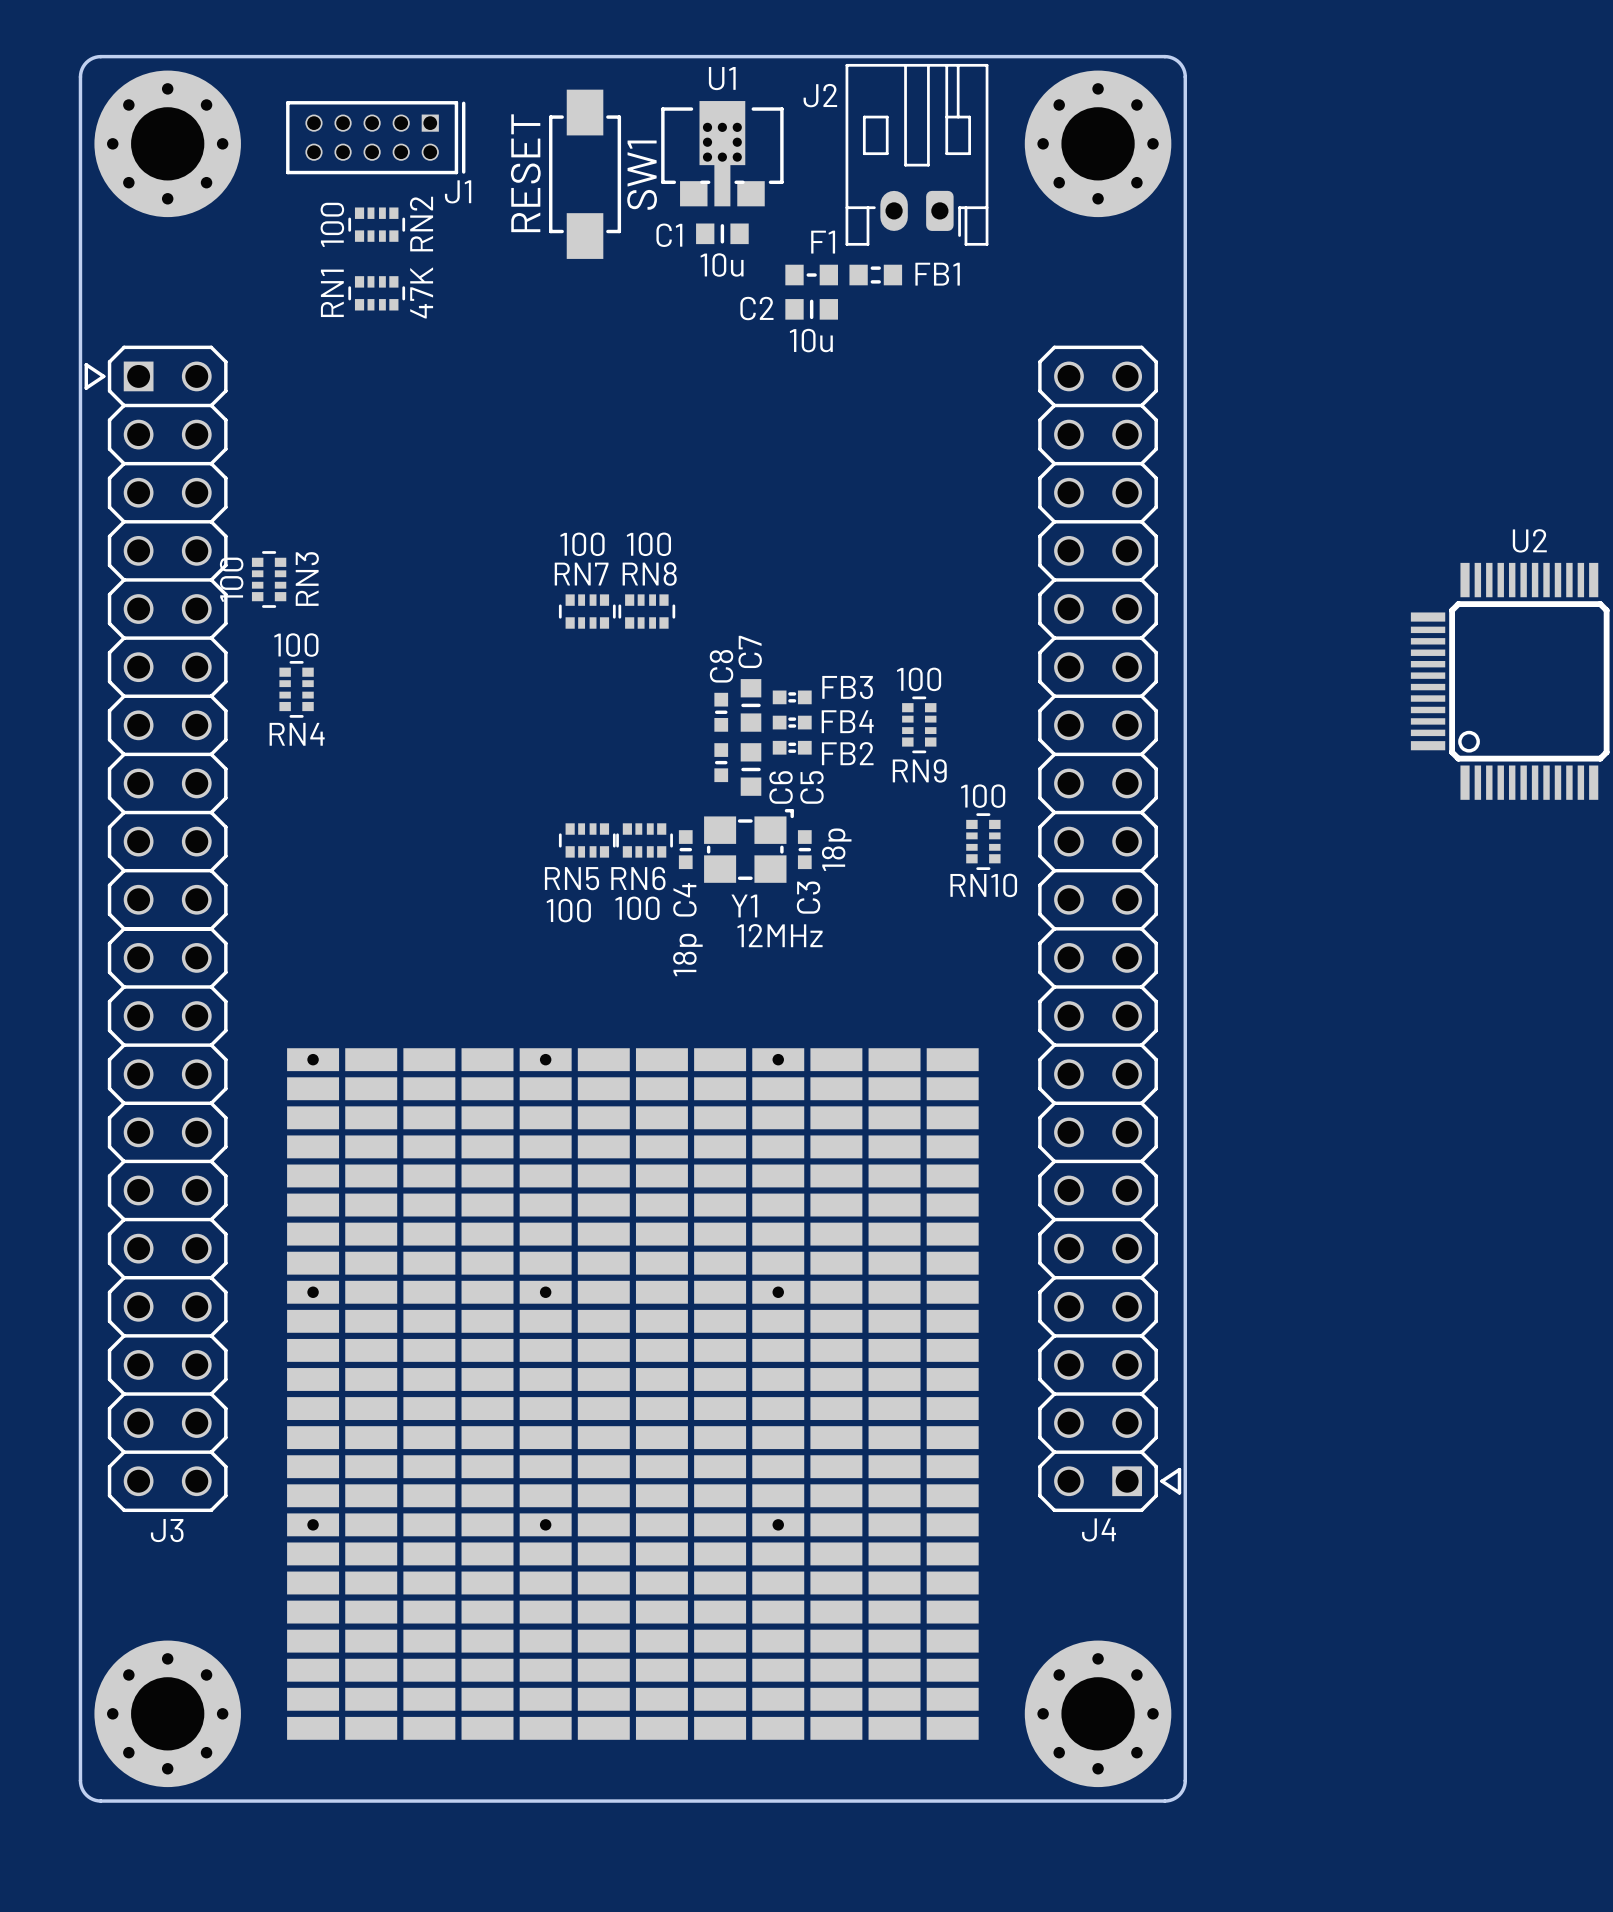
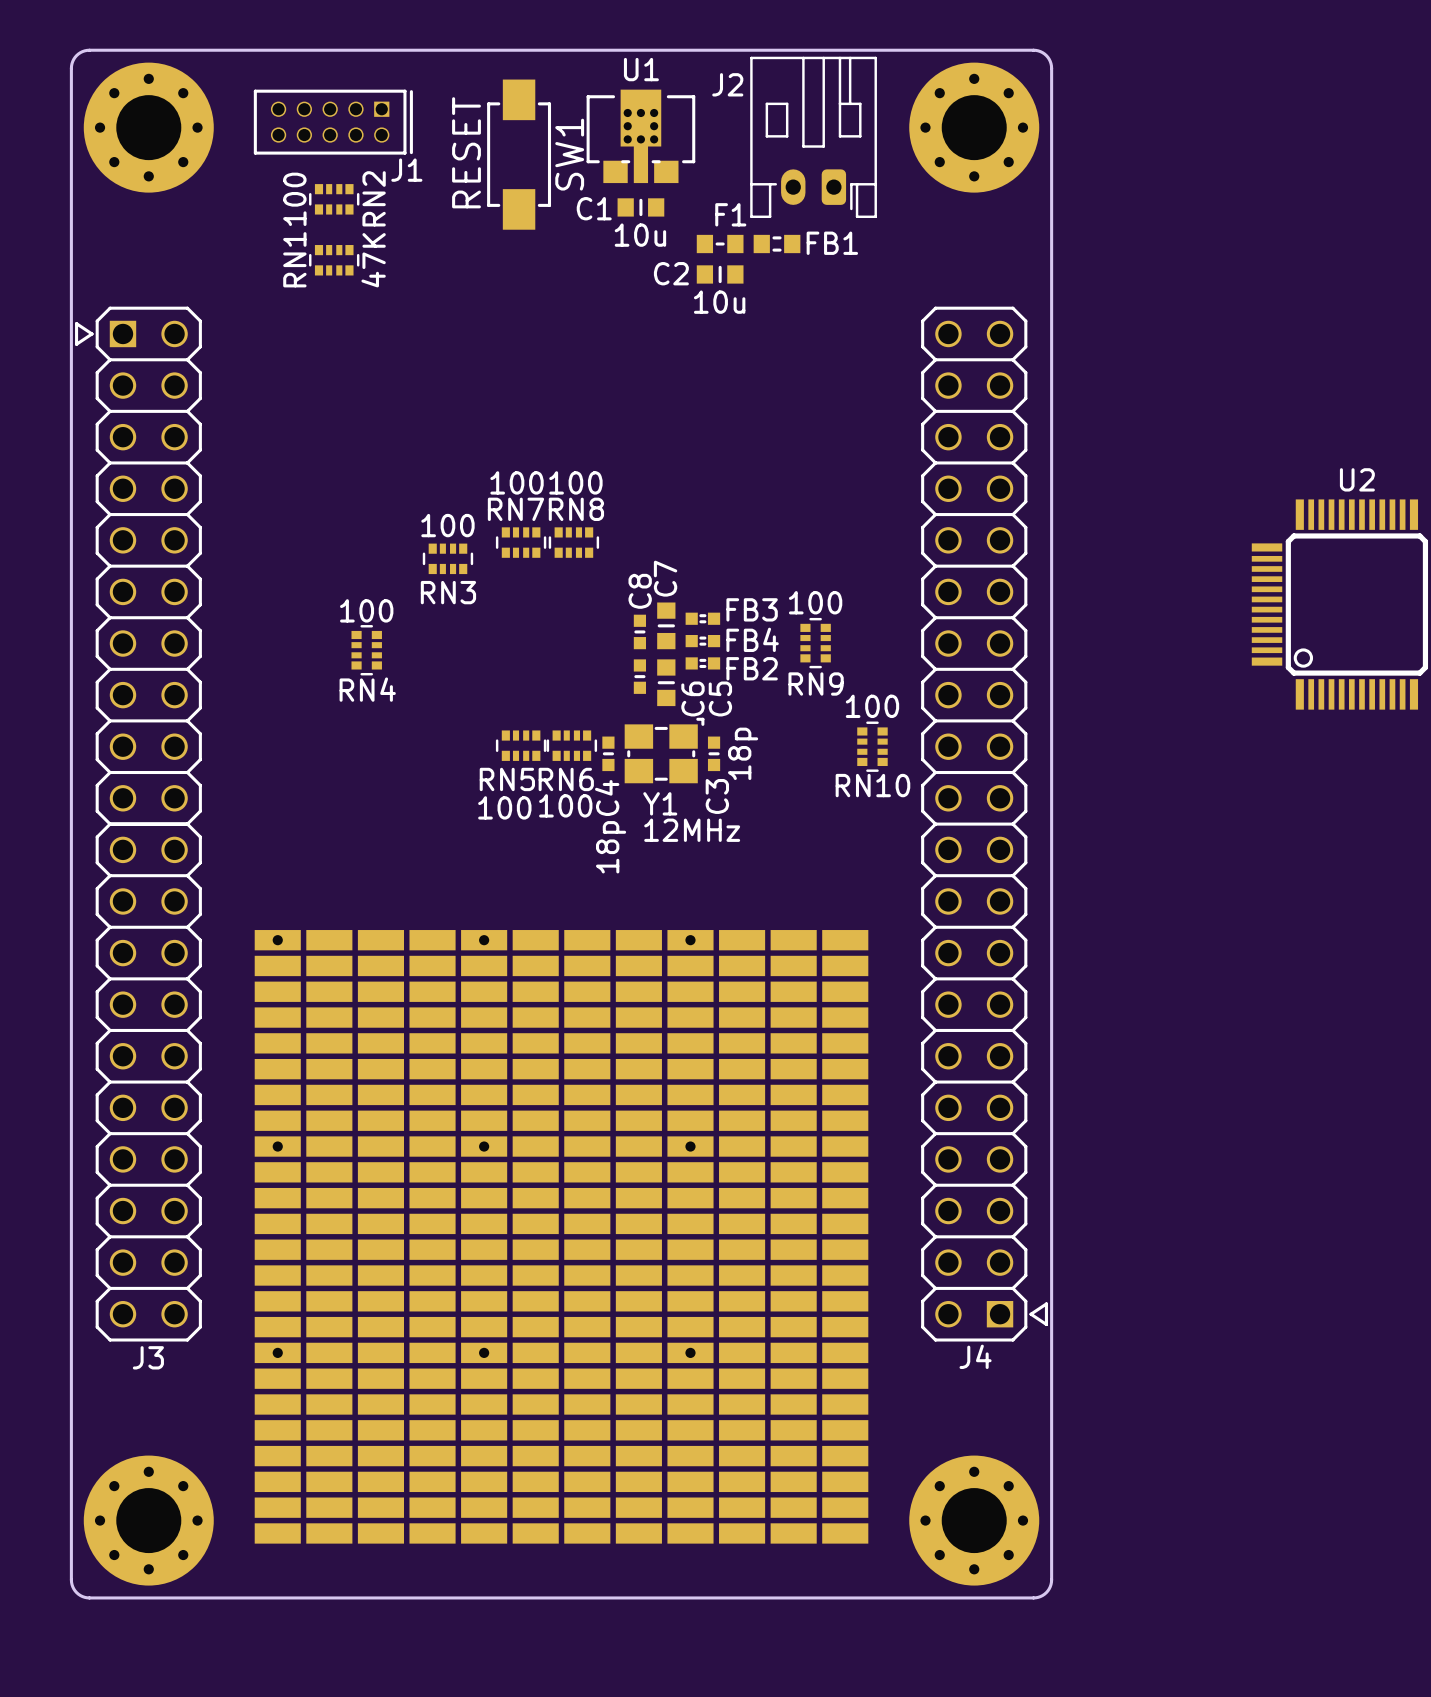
RN3 rotation: 0° (269, 579) -> 90° clockwise (447, 558)
RN3 position: (269, 579) -> (447, 558)
RN4 position: (296, 689) -> (366, 650)

